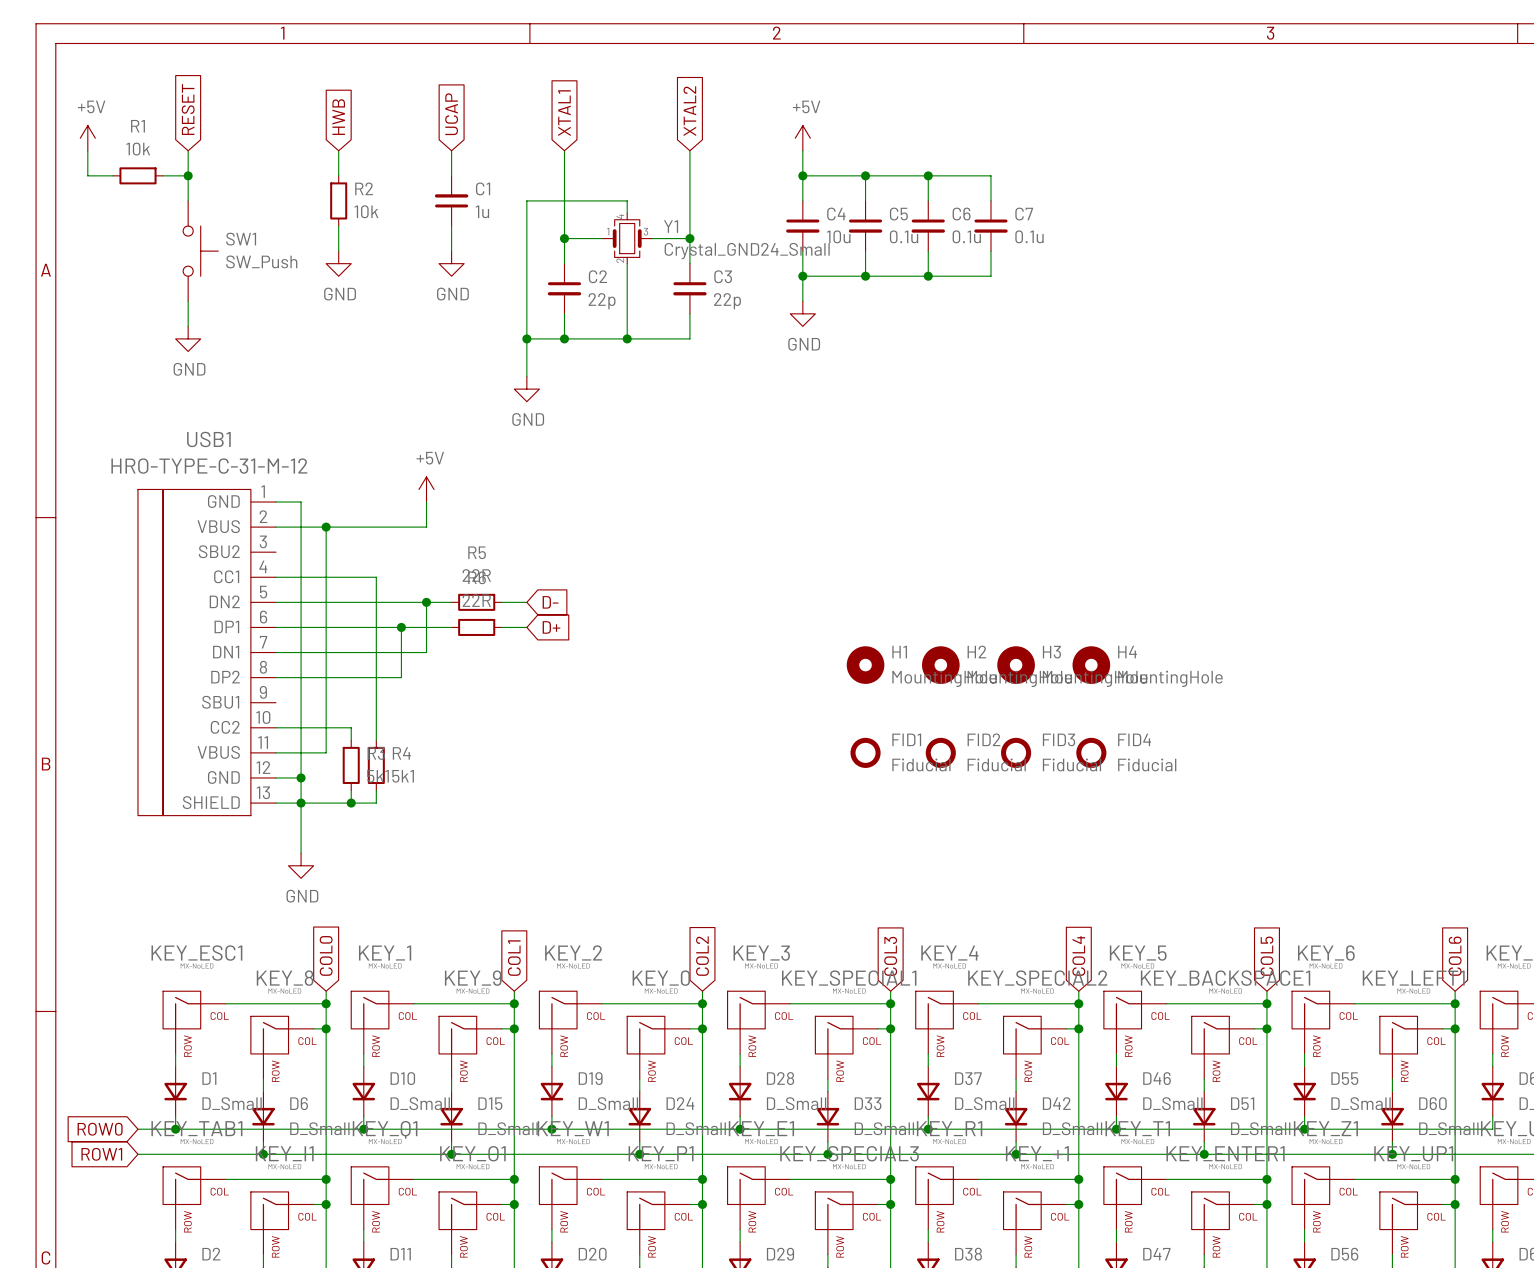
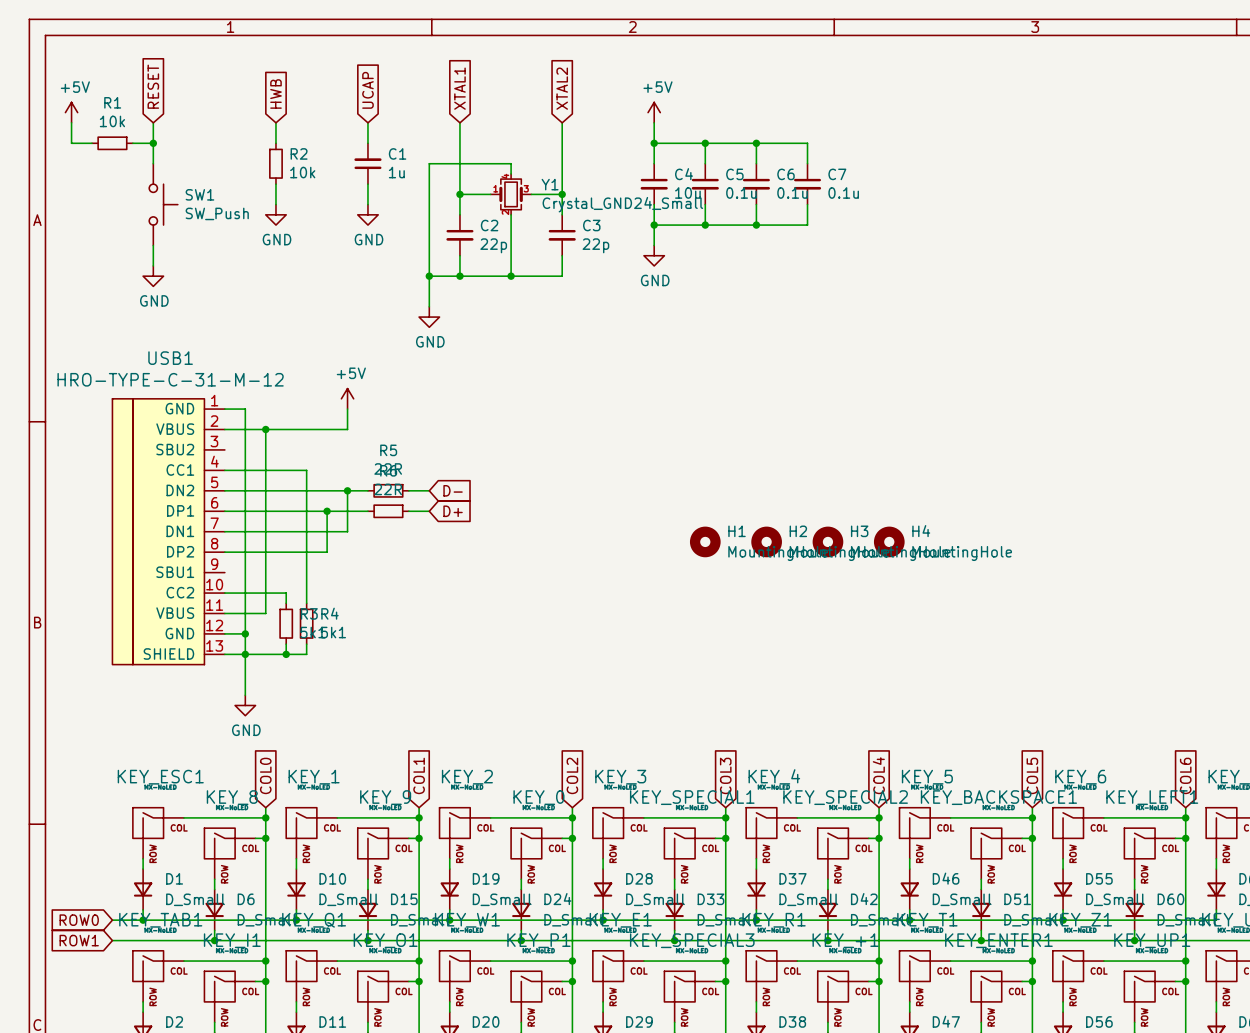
FID1: Fiducial (865, 752) -> none
FID2: Fiducial (940, 752) -> none
FID3: Fiducial (1016, 752) -> none
FID4: Fiducial (1091, 752) -> none

